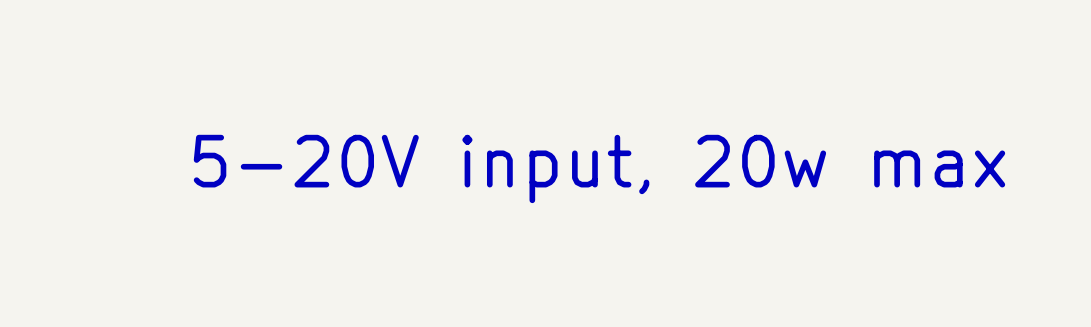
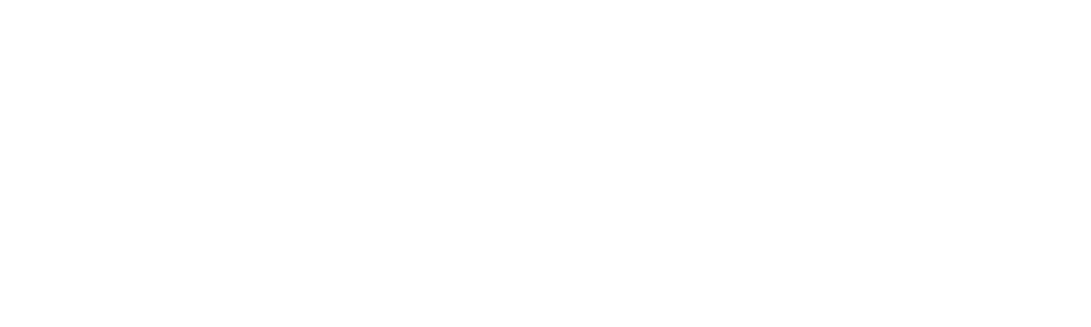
text: 5-20V input, 20w max (599, 168) -> none

